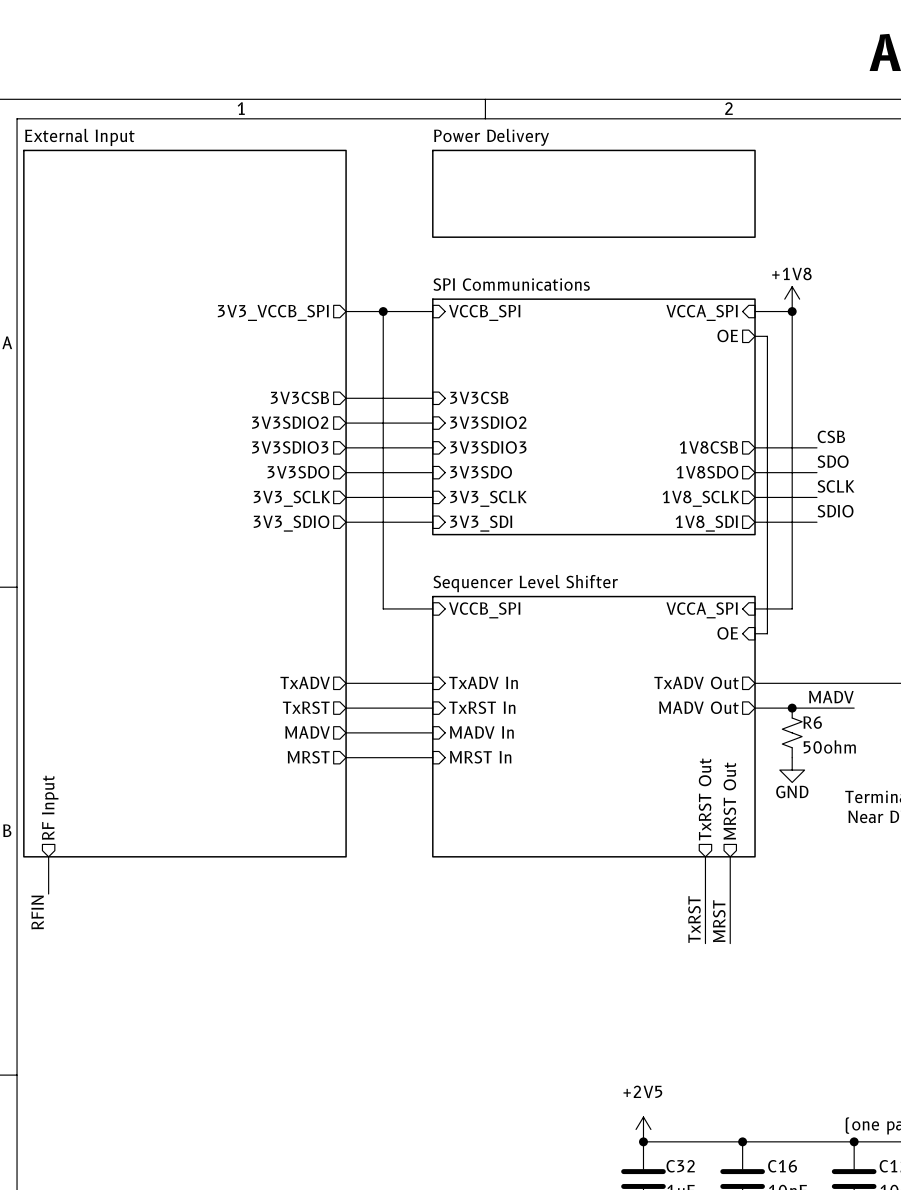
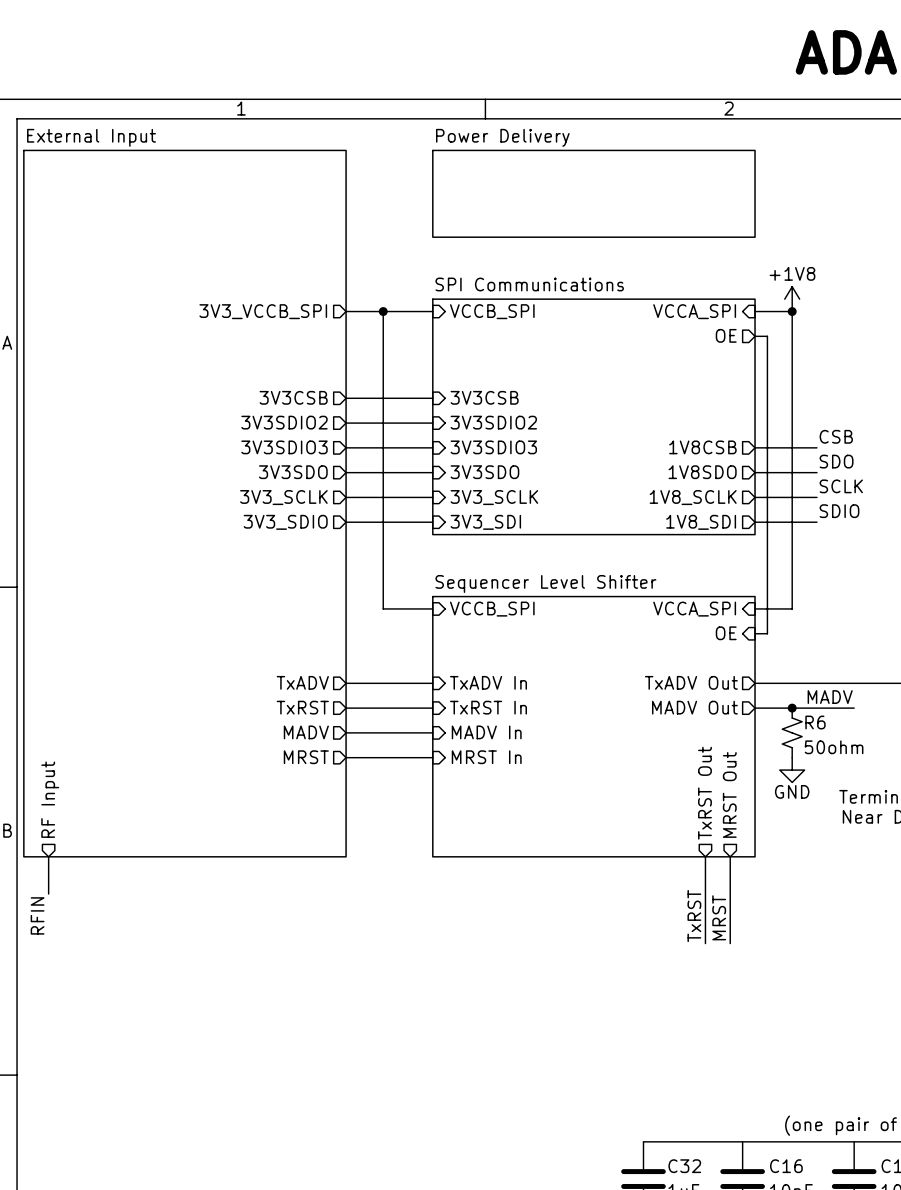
power symbol: +2V5 (643, 1129) -> none
junction: (643, 1141) -> none
junction: (742, 1141) -> none
junction: (854, 1141) -> none

